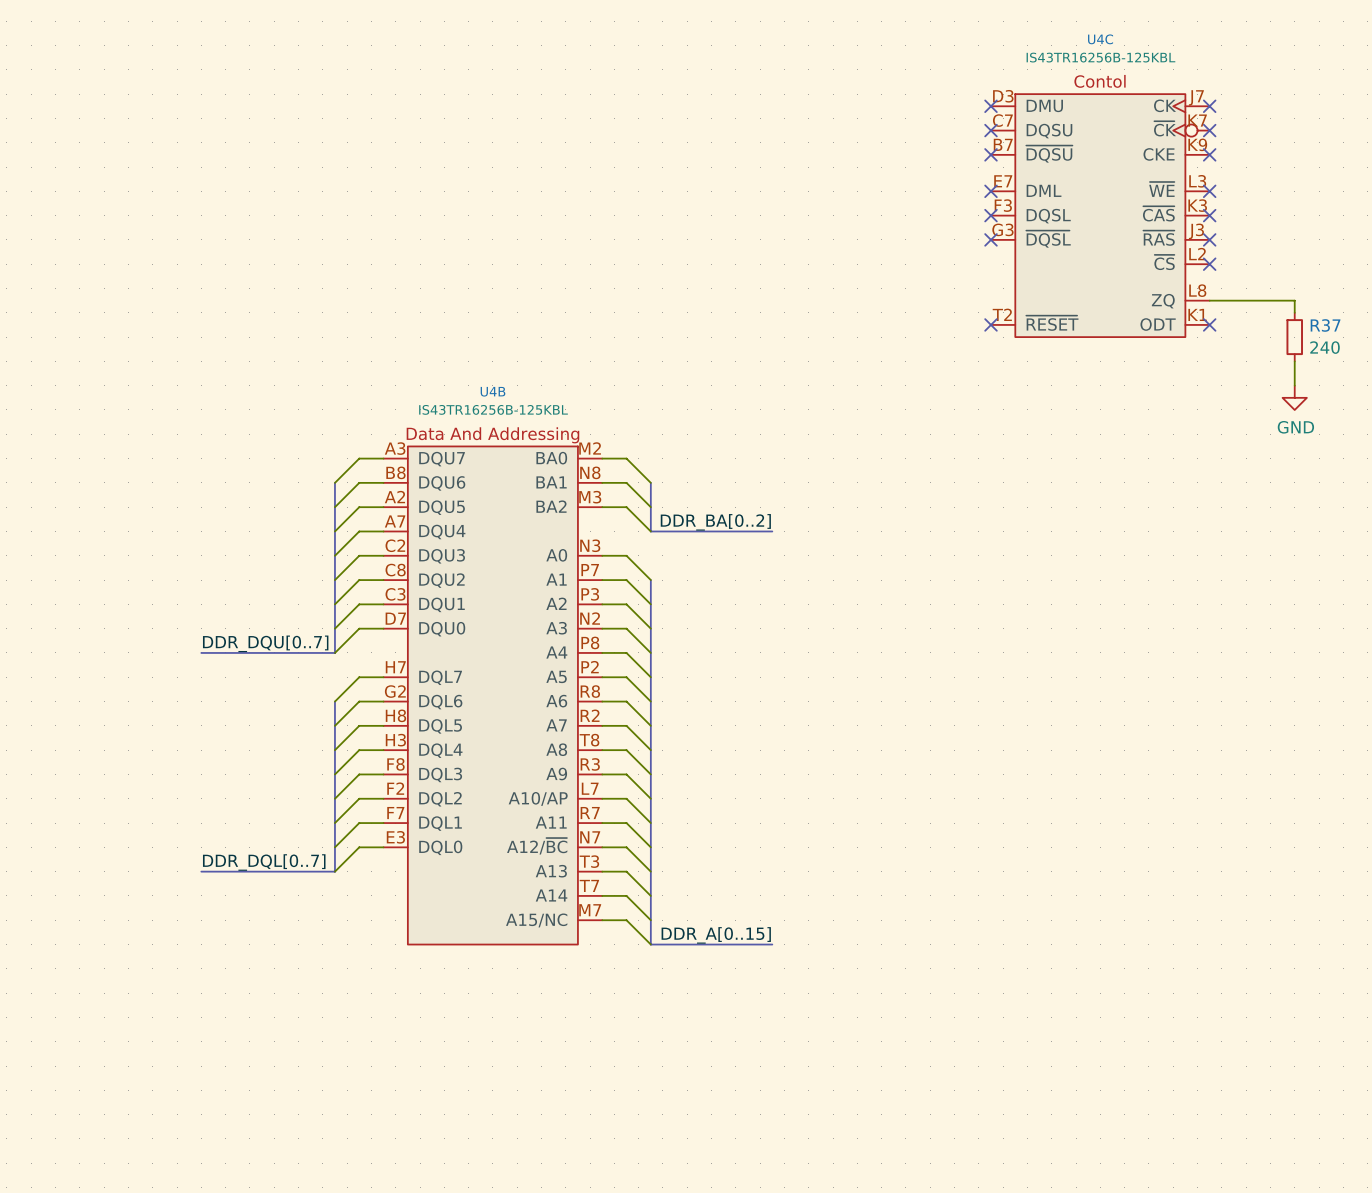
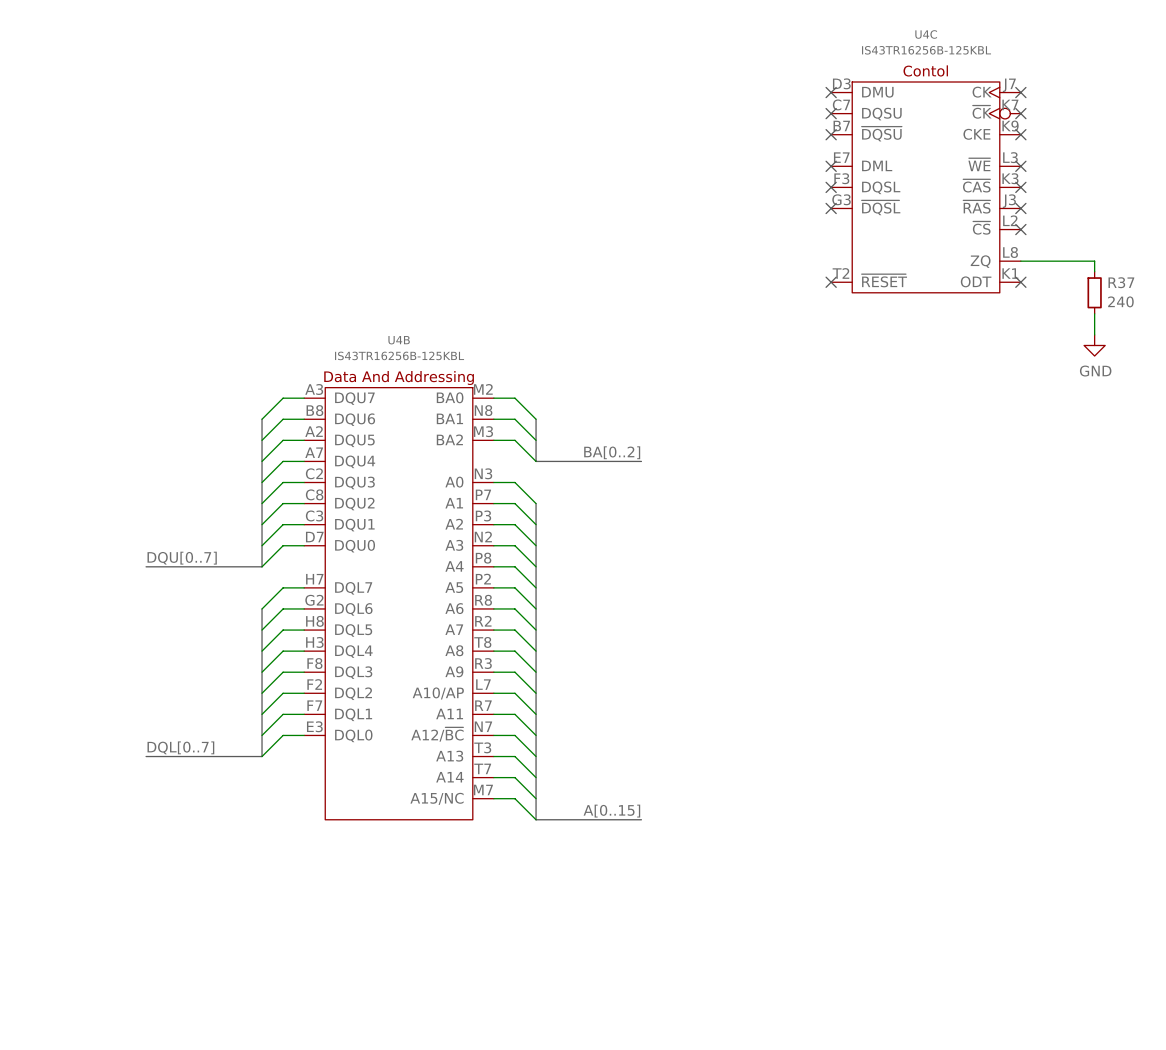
label: DDR_BA[0..2] (715, 522) -> BA[0..2] (612, 452)
label: DDR_DQU[0..7] (265, 643) -> DQU[0..7] (182, 558)
label: DDR_DQL[0..7] (264, 862) -> DQL[0..7] (180, 747)
label: DDR_A[0..15] (716, 935) -> A[0..15] (611, 811)

